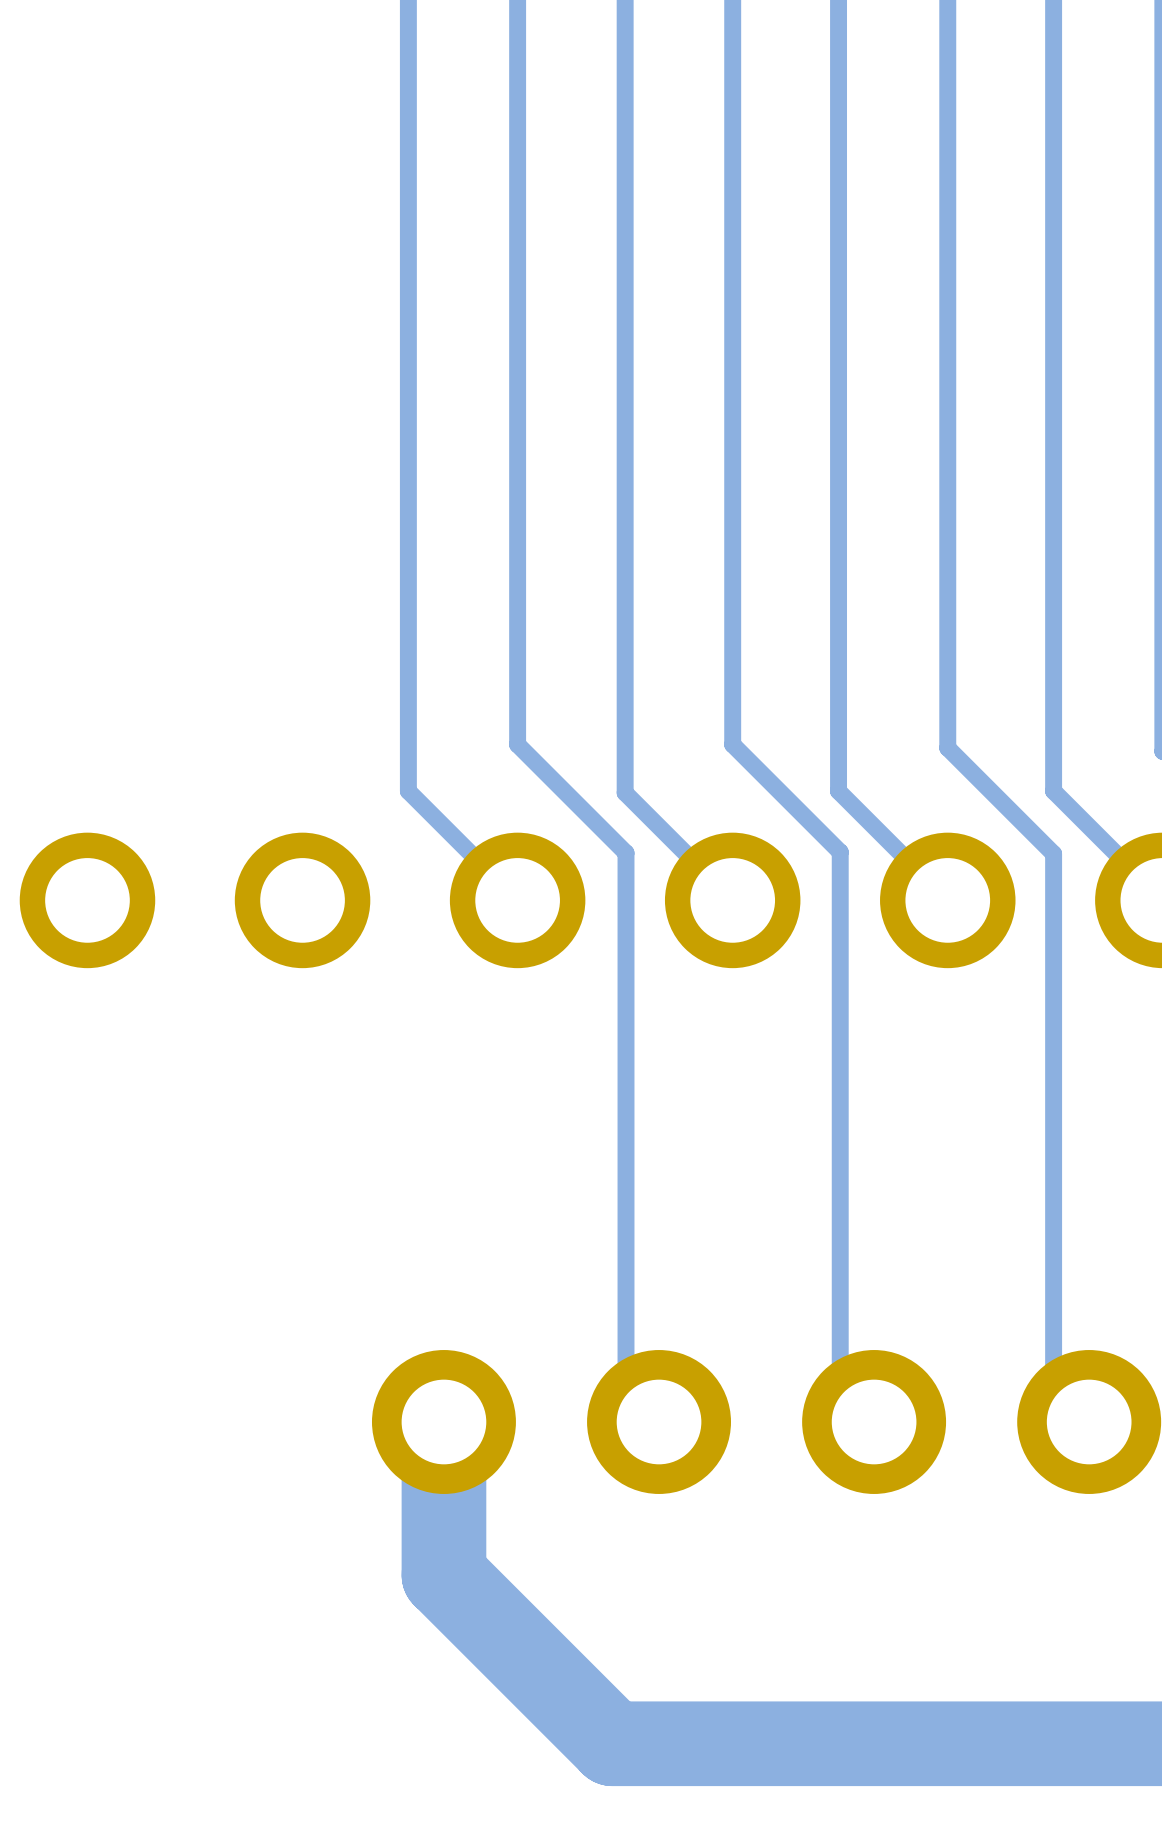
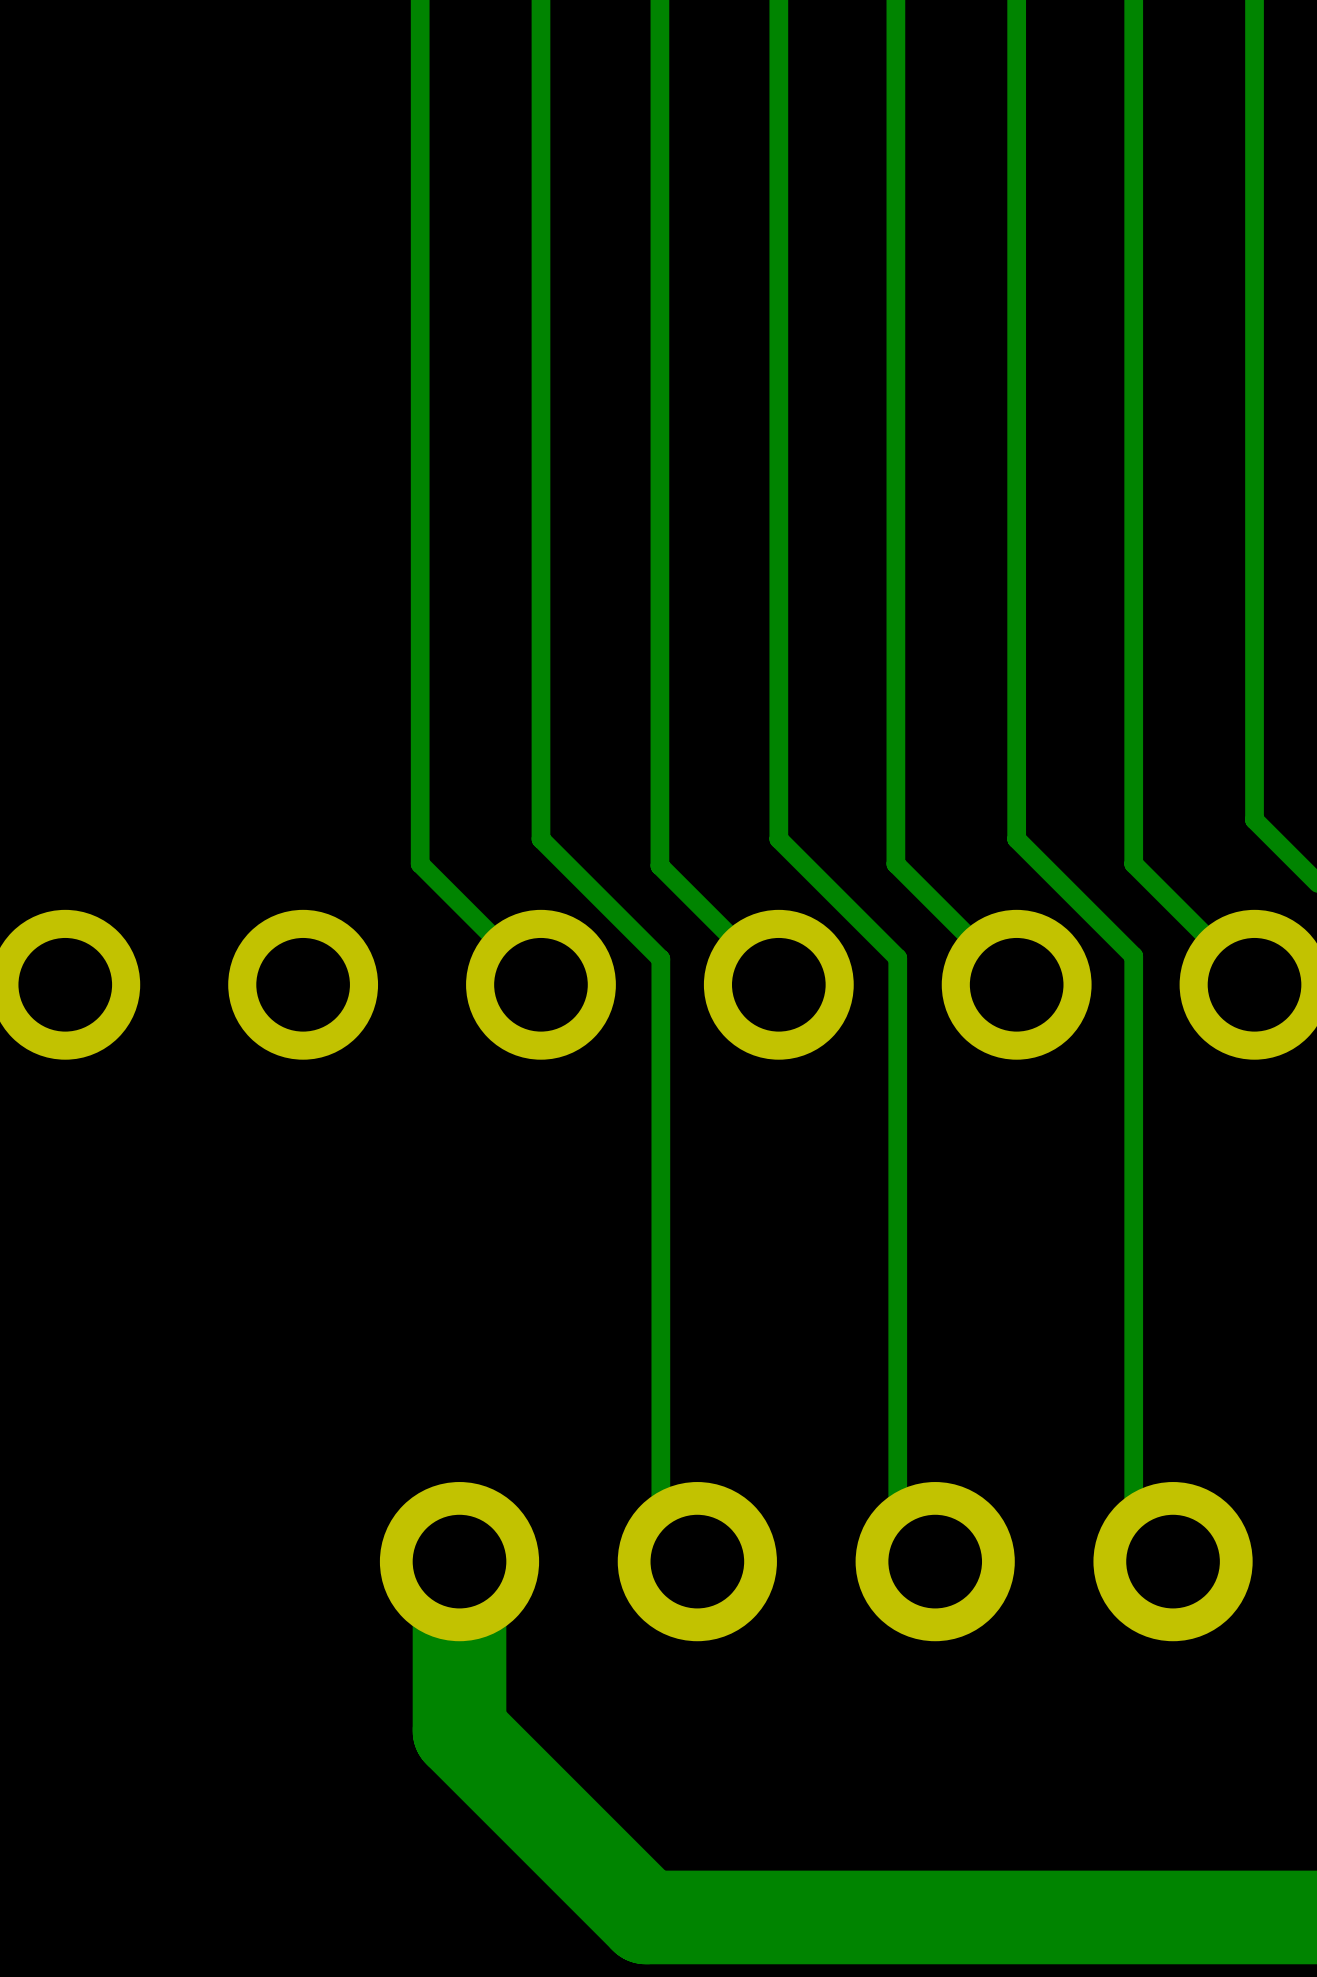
bottom track: (517, 744) (626, 852) (626, 877) -> (540, 812) (540, 839) (660, 958)
bottom track: (732, 744) (840, 852) (840, 876) -> (778, 812) (778, 839) (897, 958)
bottom track: (947, 747) (1053, 853) (1053, 874) -> (1016, 816) (1016, 839) (1133, 956)

